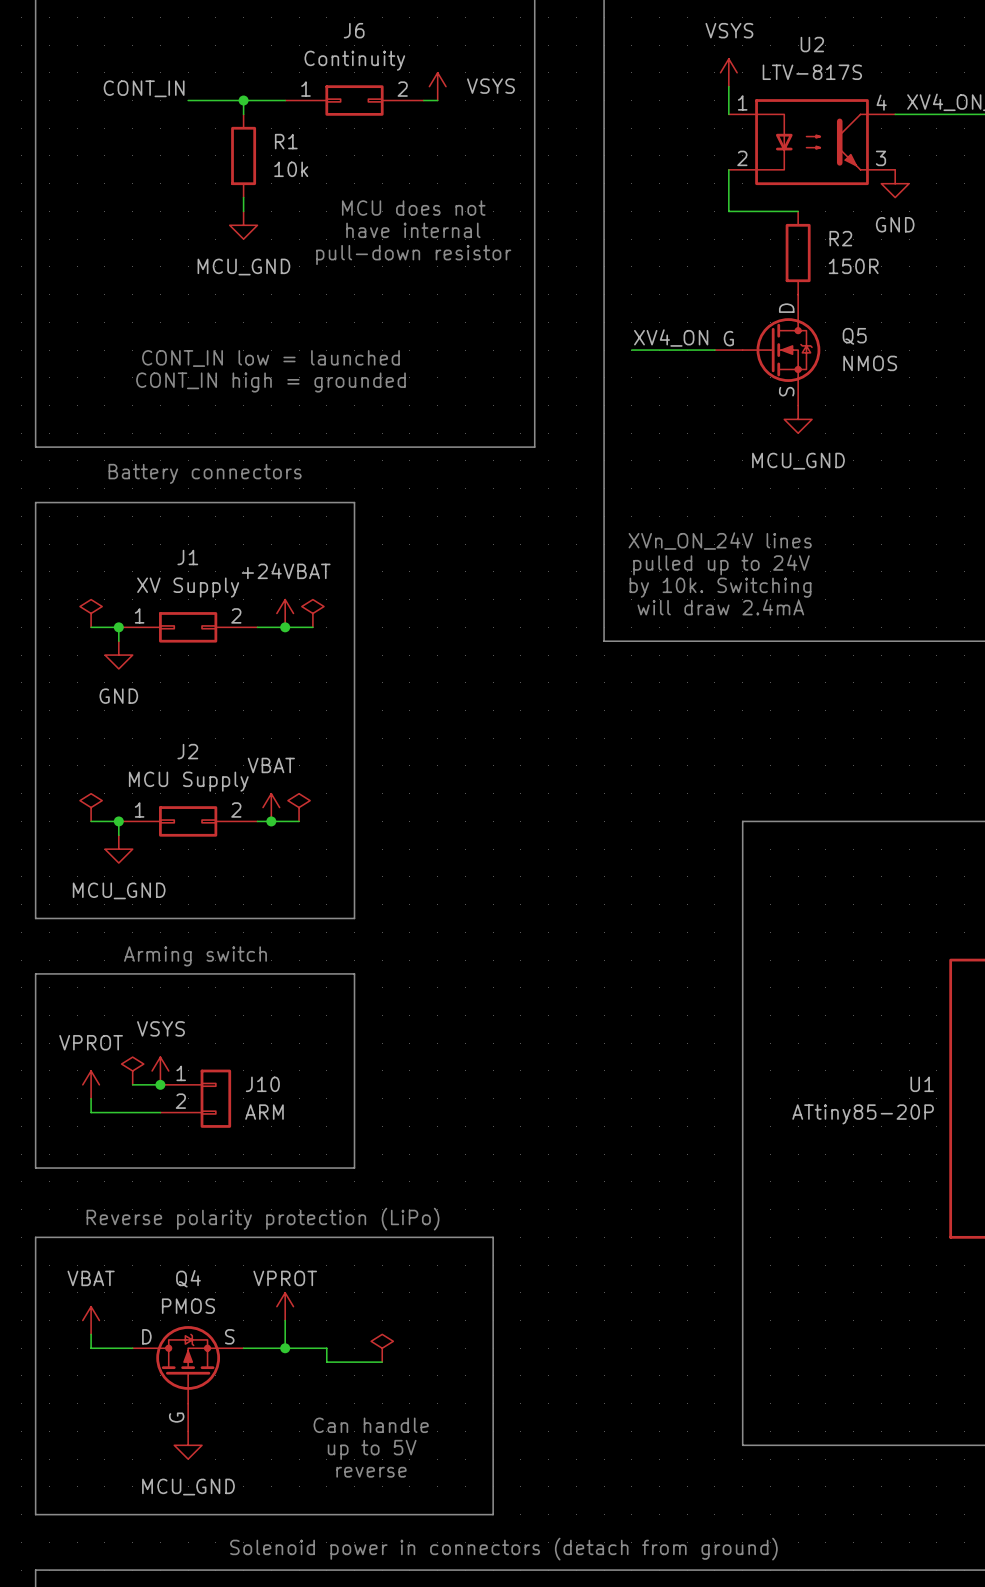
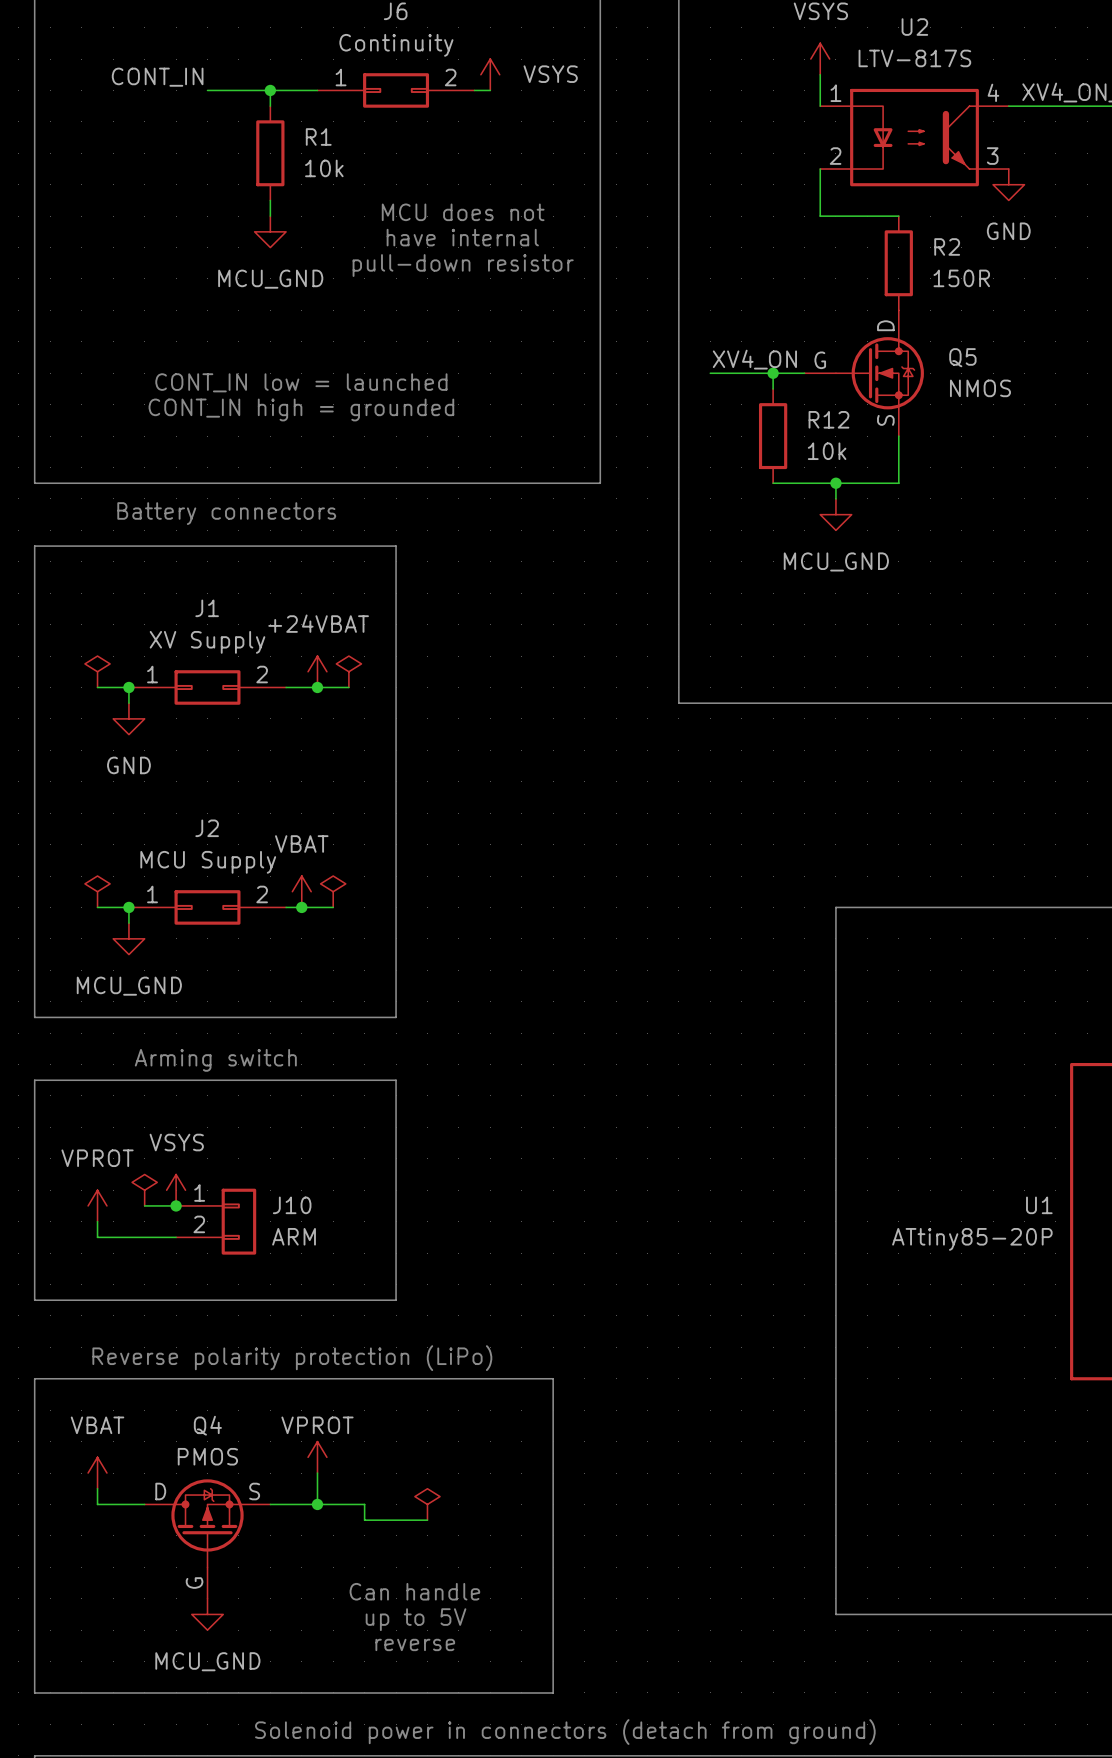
wire: none -> (773, 373) (773, 388)
junction: none -> (773, 373)
R12: none -> 10k (773, 436)
wire: none -> (898, 436) (898, 483) (773, 483)
power symbol position: MCU_GND (798, 419) -> MCU_GND (835, 514)
wire: none -> (835, 483) (835, 498)
junction: none -> (835, 483)
text: XVn_ON_24V lines (720, 541) -> none
text: pulled up to 24V (721, 565) -> none
text: by 10k. Switching (720, 587) -> none
text: will draw 2.4mA (720, 607) -> none

